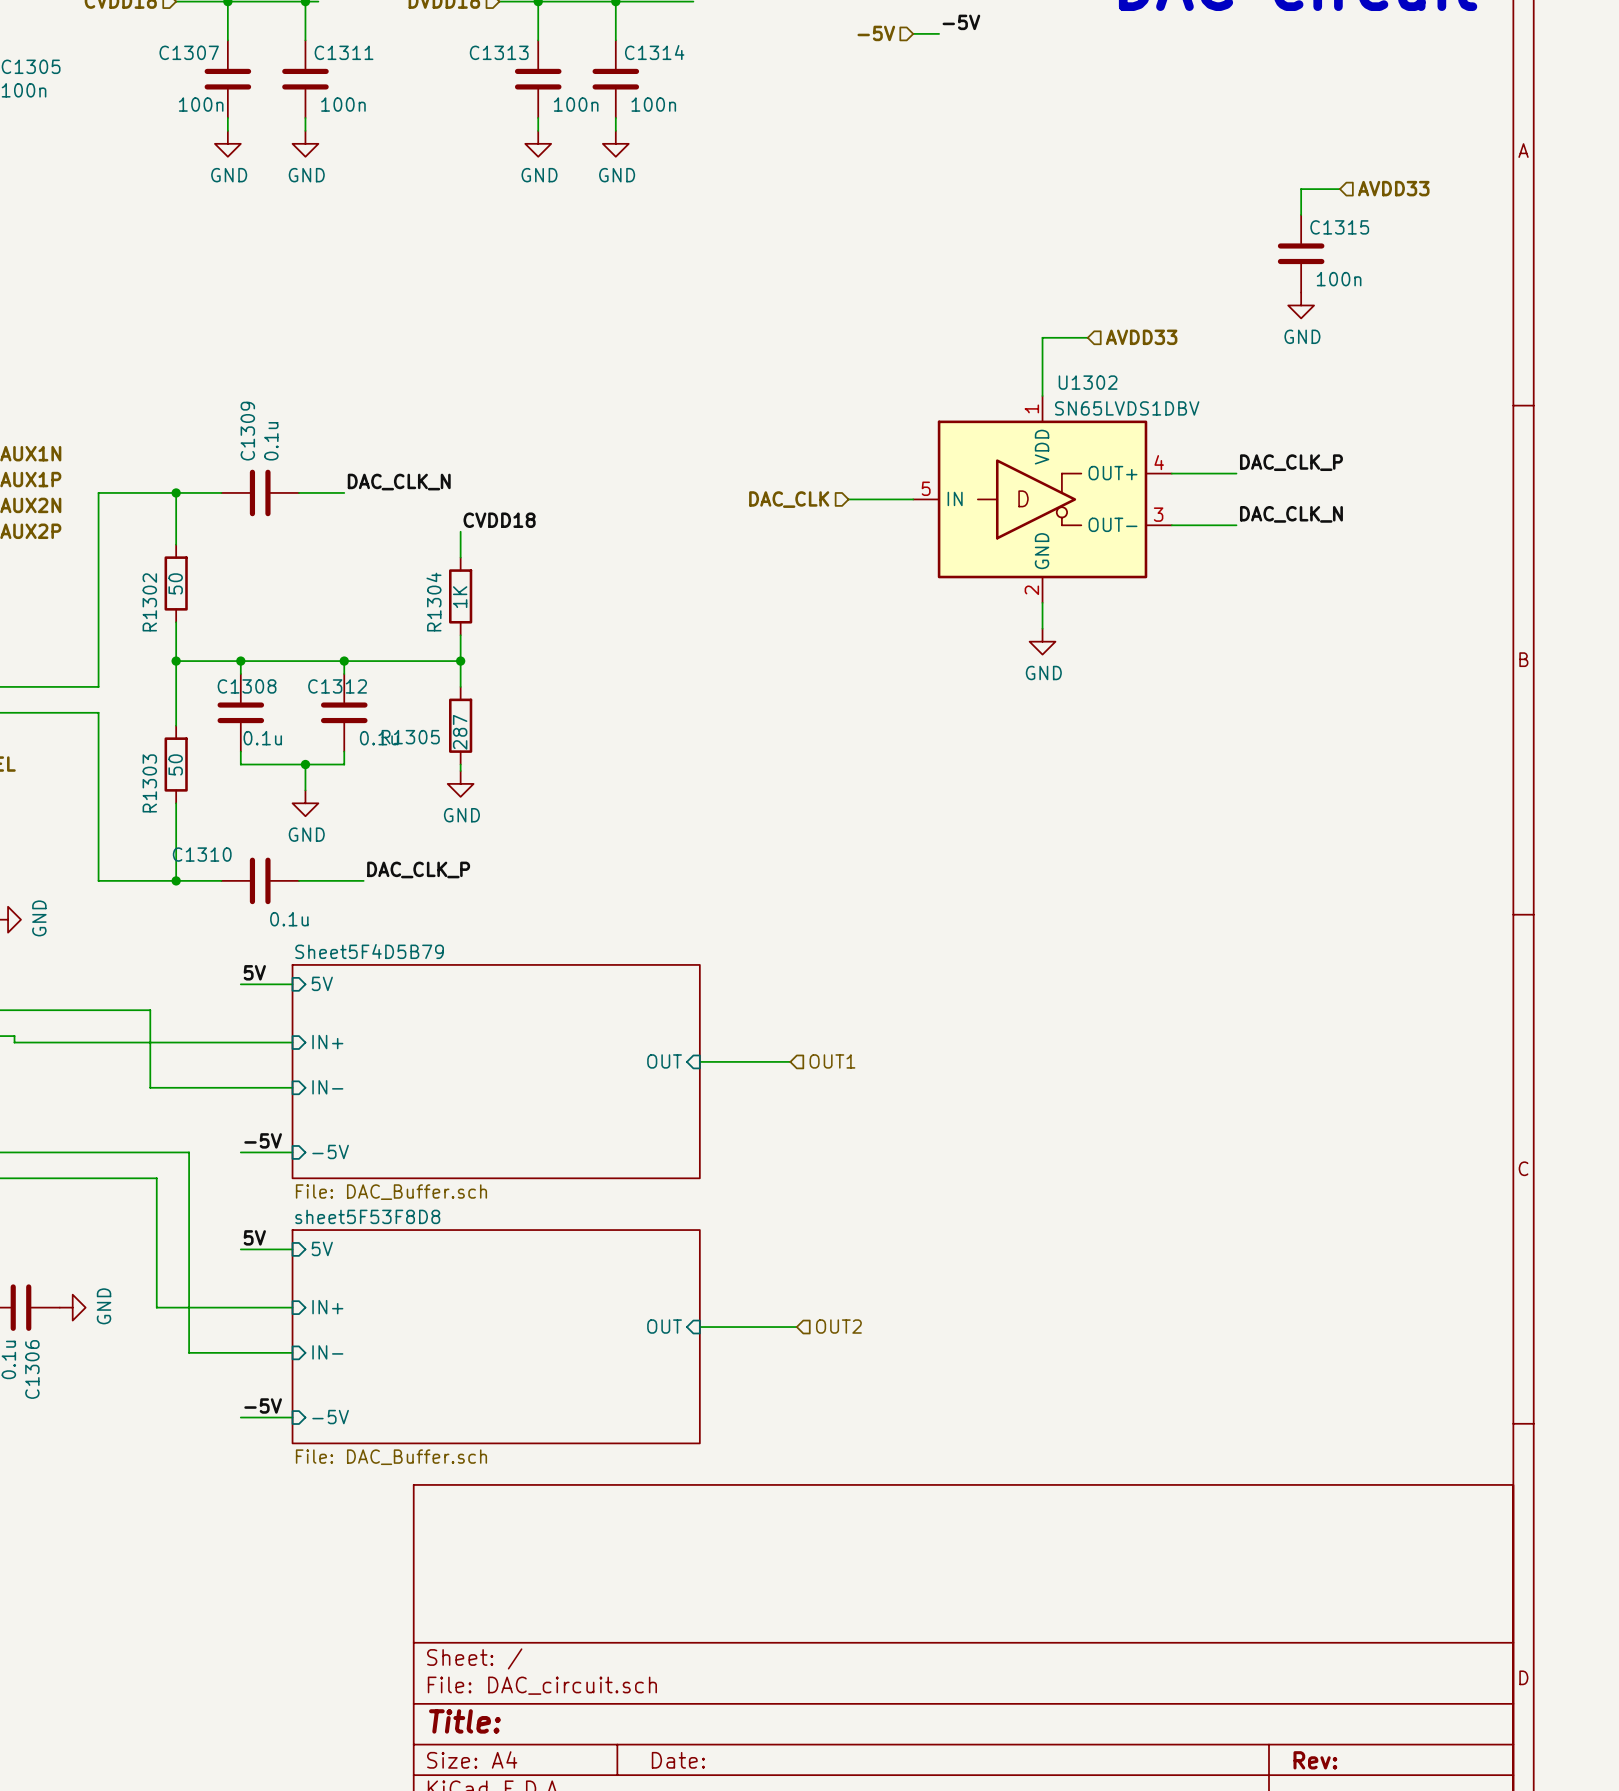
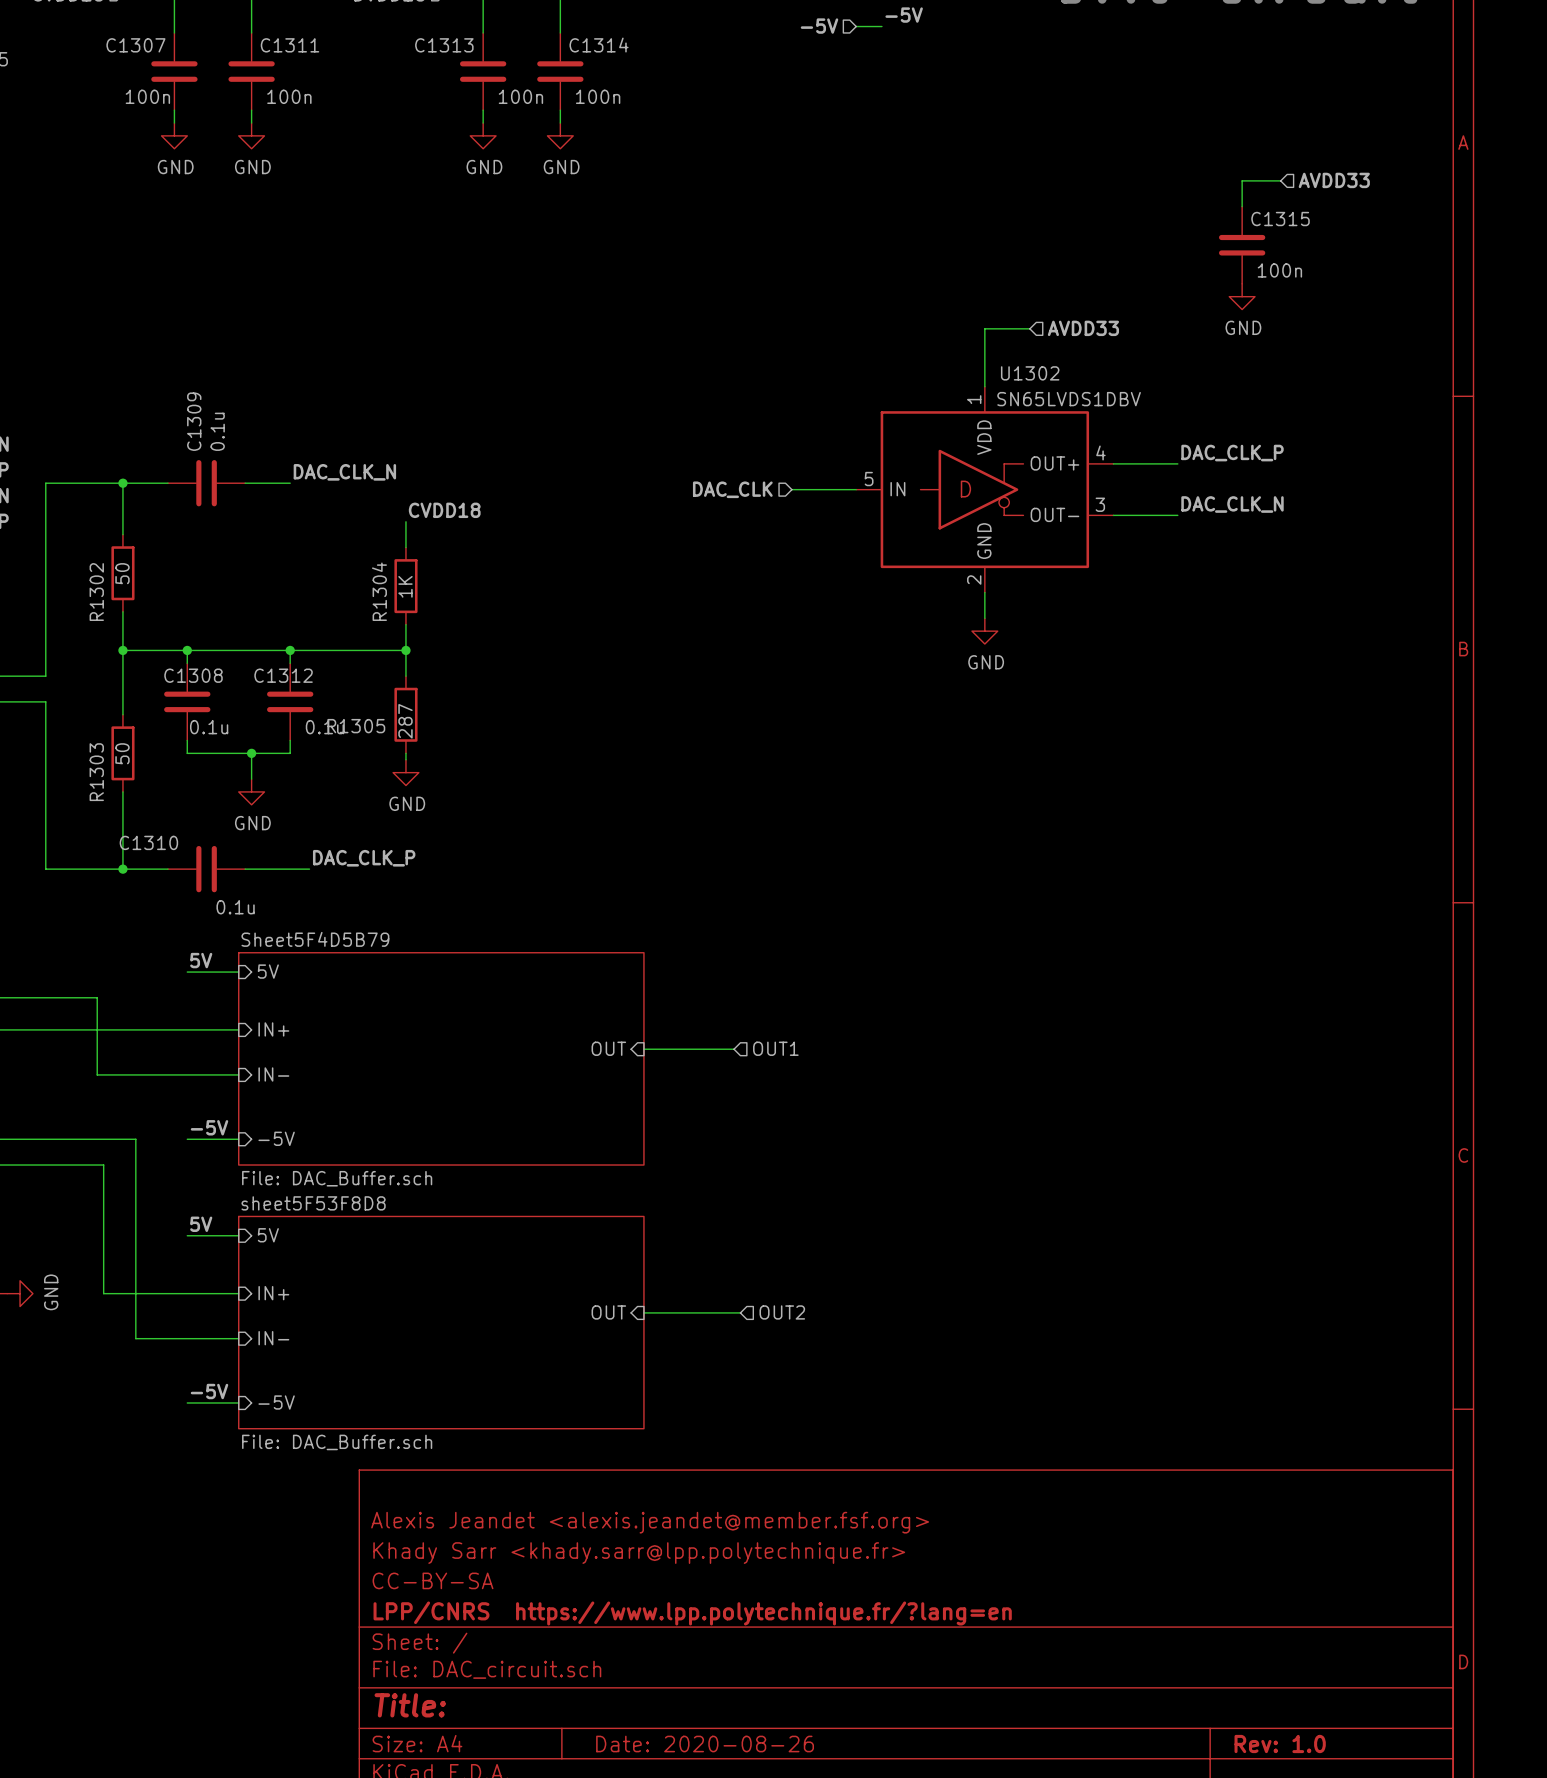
title block: none -> Alexis Jeandet <alexis.jeandet@member.fsf.org> (650, 1522)
title block: none -> Khady Sarr <khady.sarr@lpp.polytechnique.fr> (639, 1553)
title block: none -> CC-BY-SA (433, 1580)
title block: none -> LPP/CNRS https://www.lpp.polytechnique.fr/?lang=en (692, 1613)
title block: Date: (678, 1760) -> Date: 2020-08-26 (705, 1744)
title block: Rev: (1315, 1760) -> Rev: 1.0 (1280, 1744)

